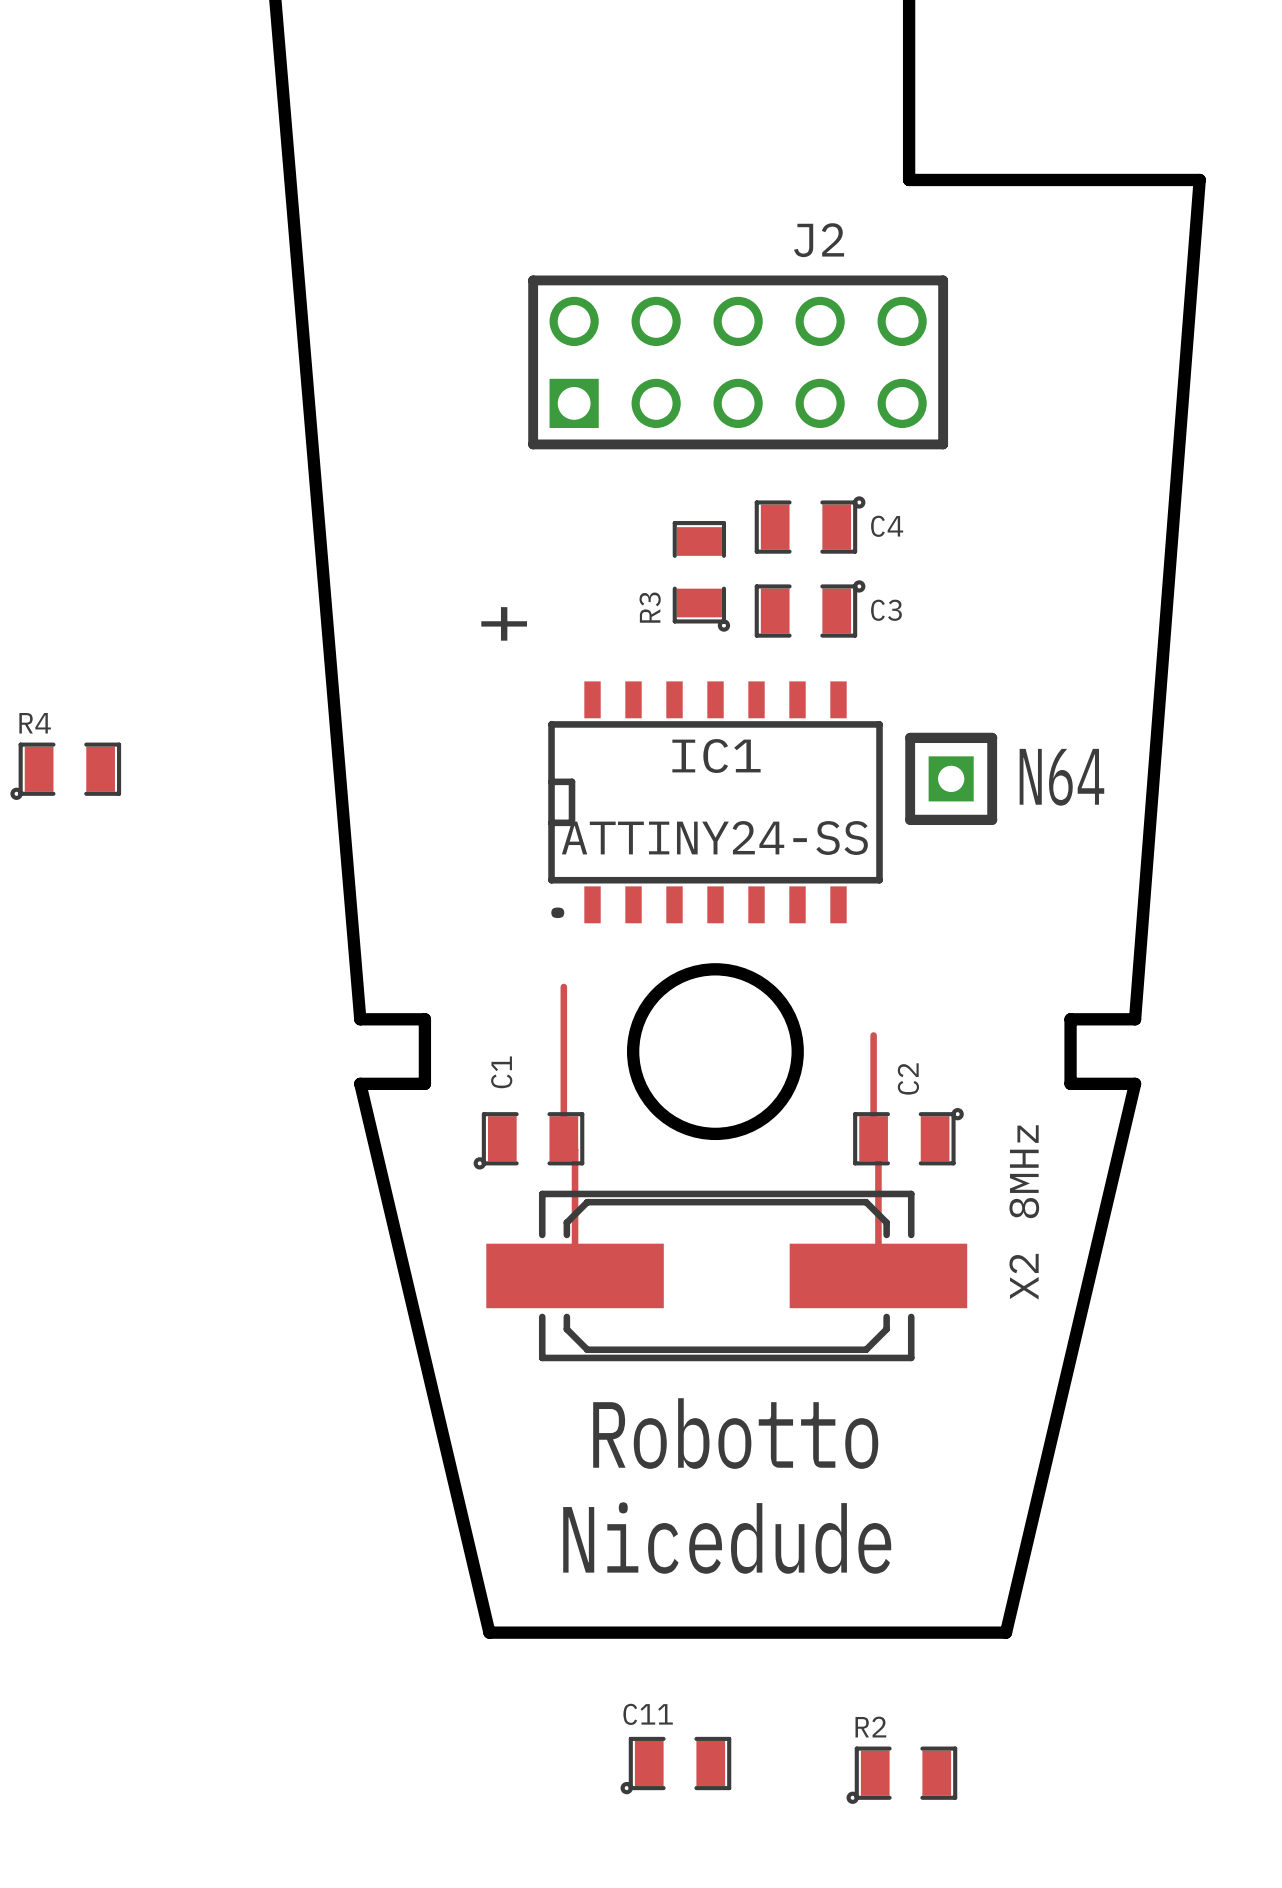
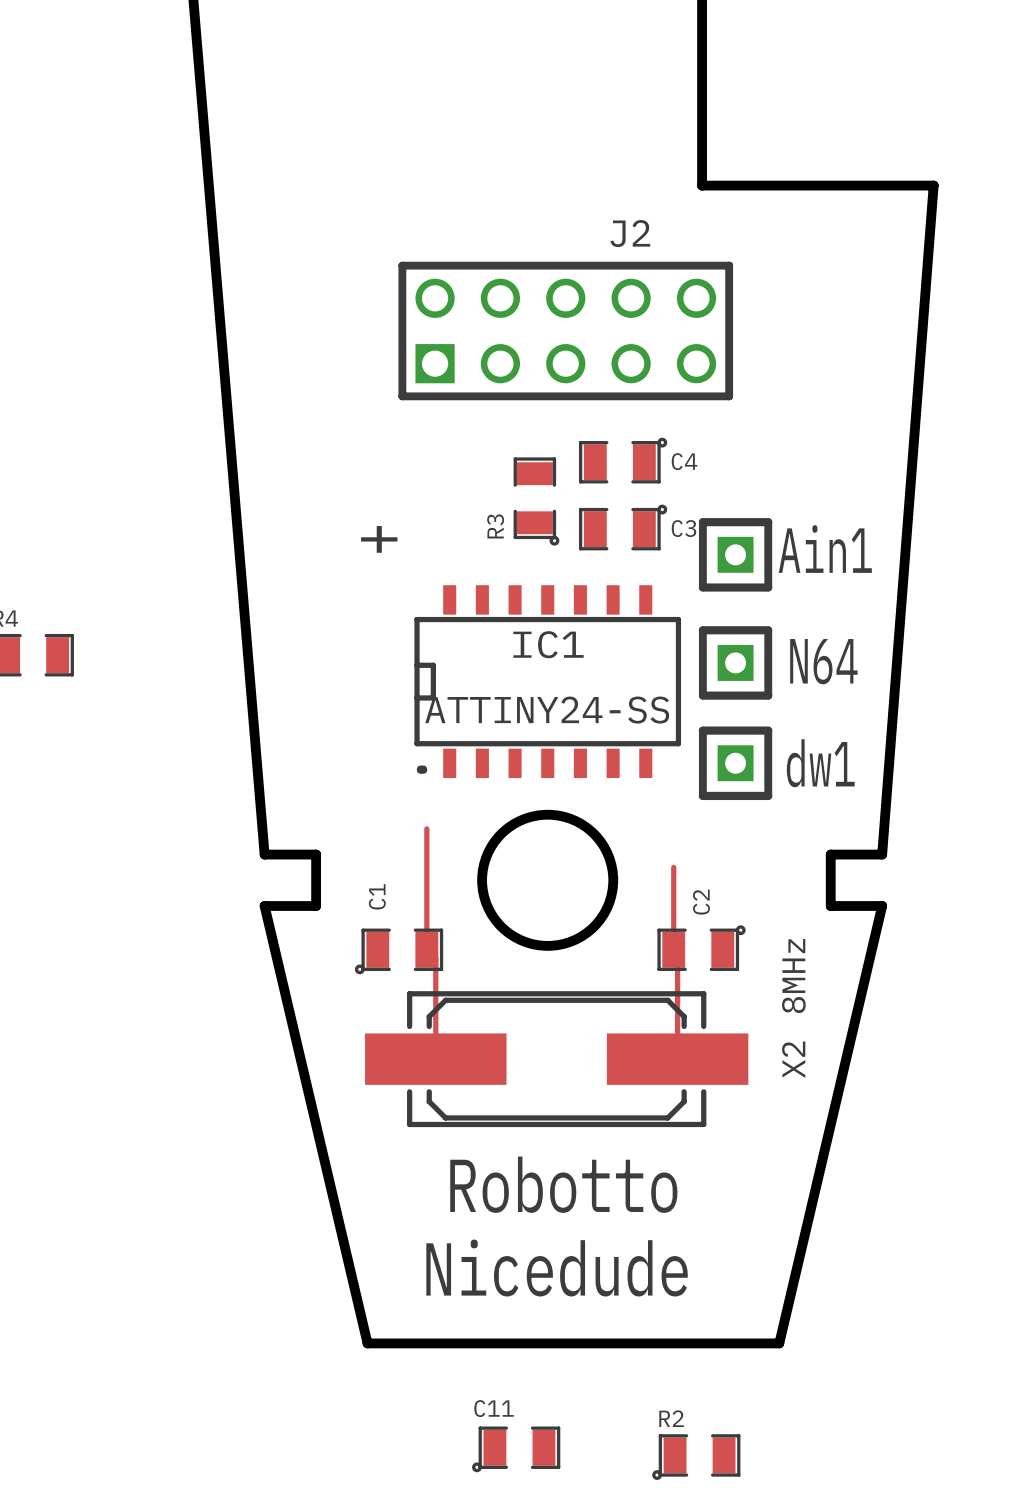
Ain1: none -> (735, 554)
dw1: none -> (735, 763)

